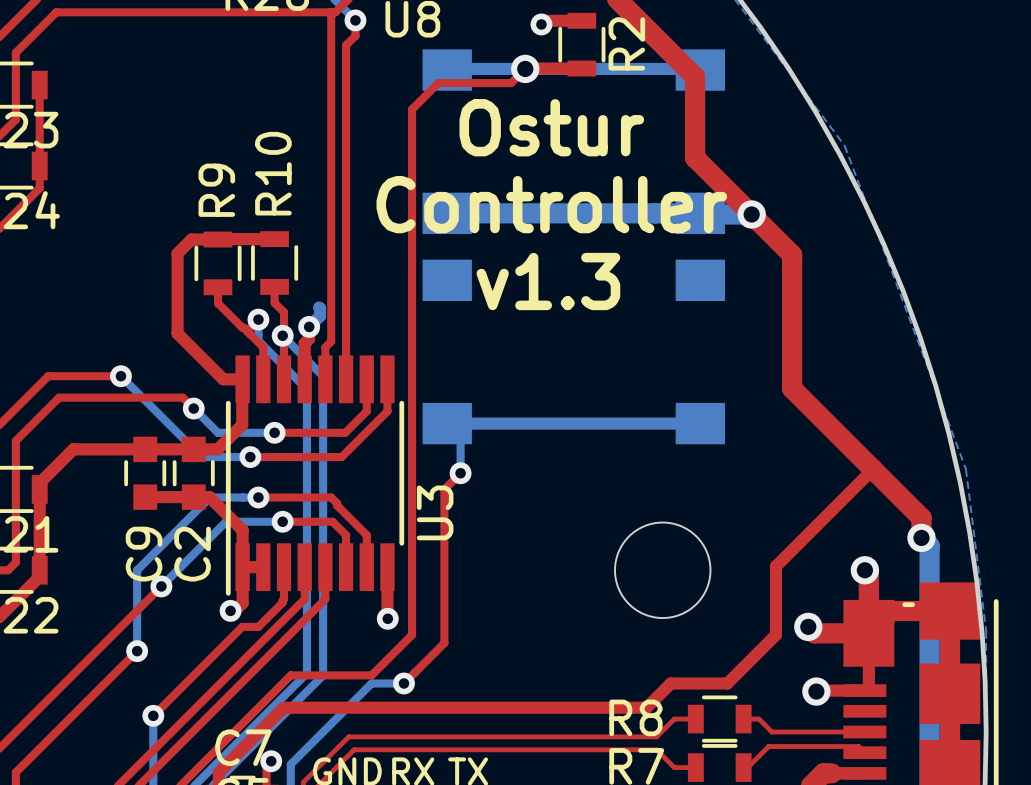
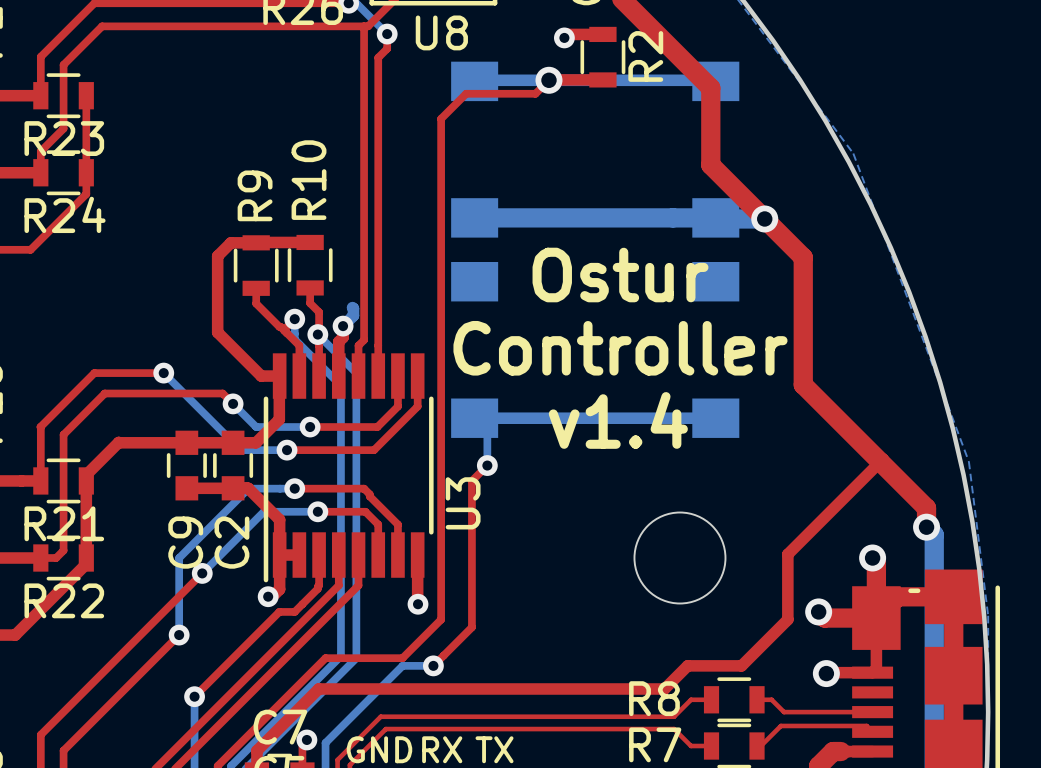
text position: Ostur (551, 127) -> Ostur (620, 275)
text position: Controller (551, 204) -> Controller (620, 348)
text: v1.3 (548, 281) -> none
text: none -> v1.4 (618, 420)

